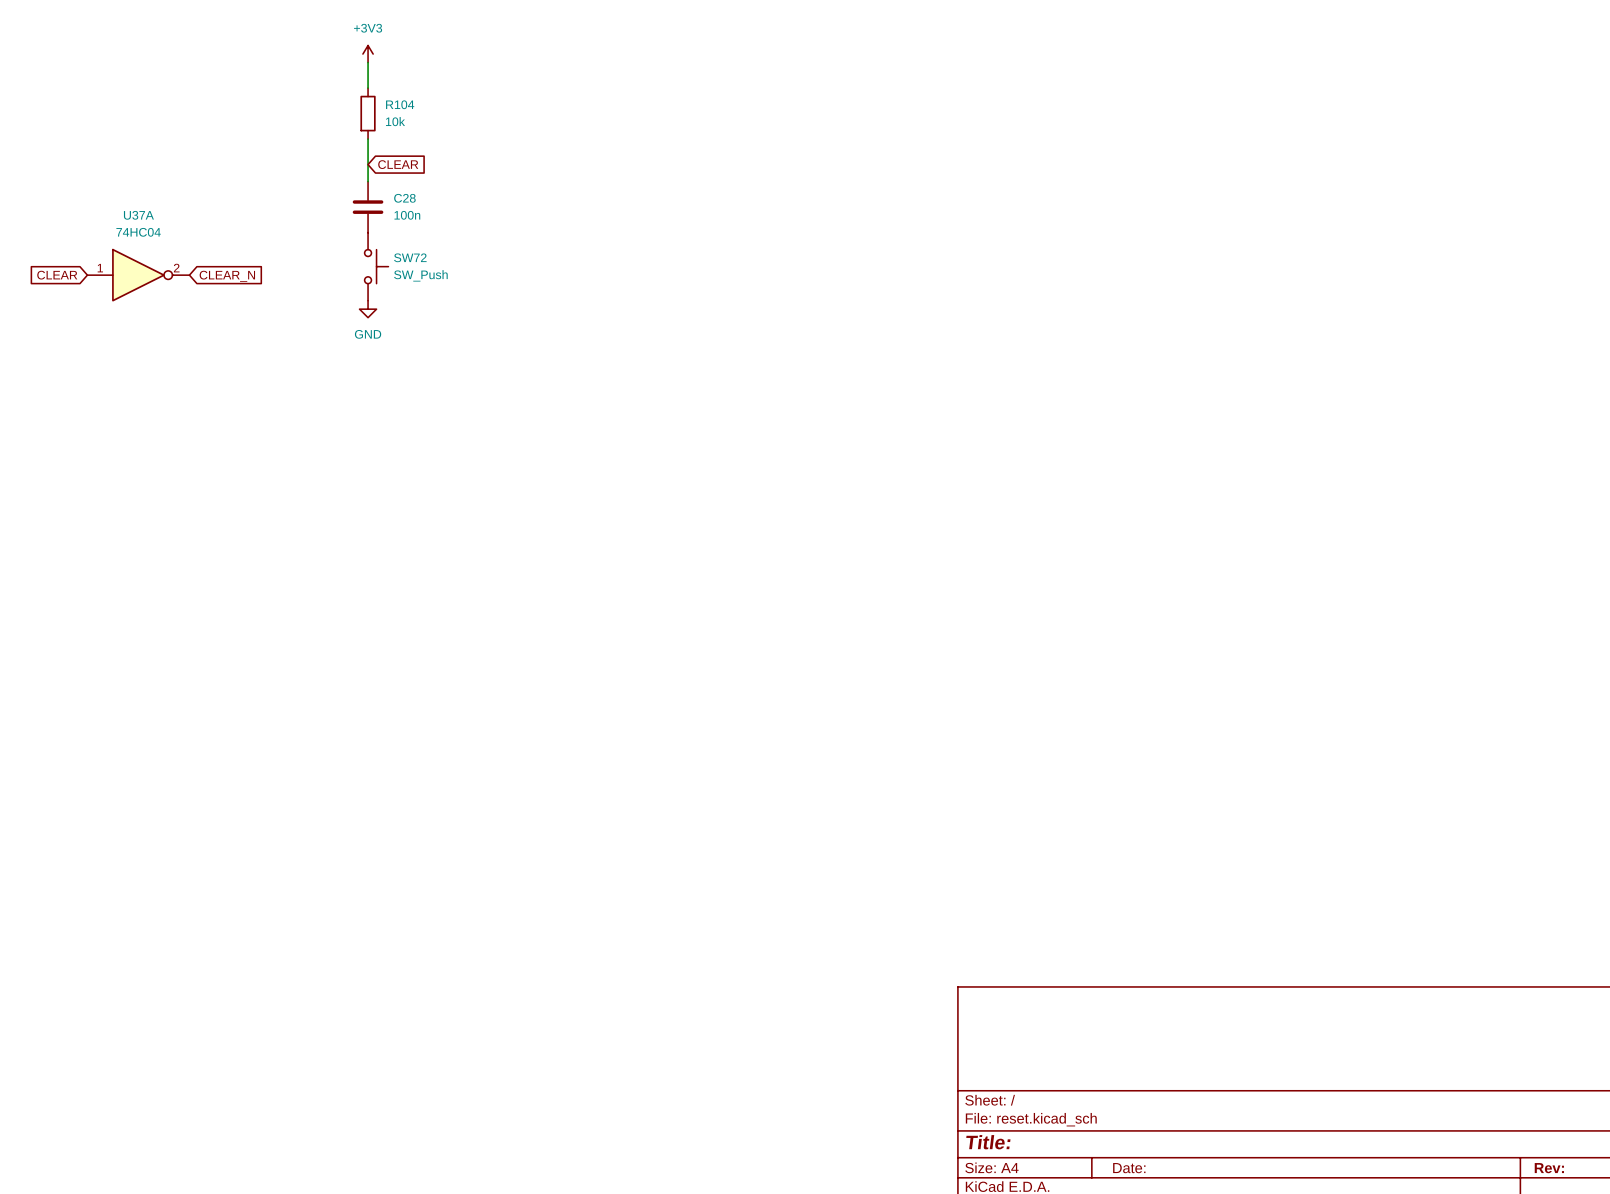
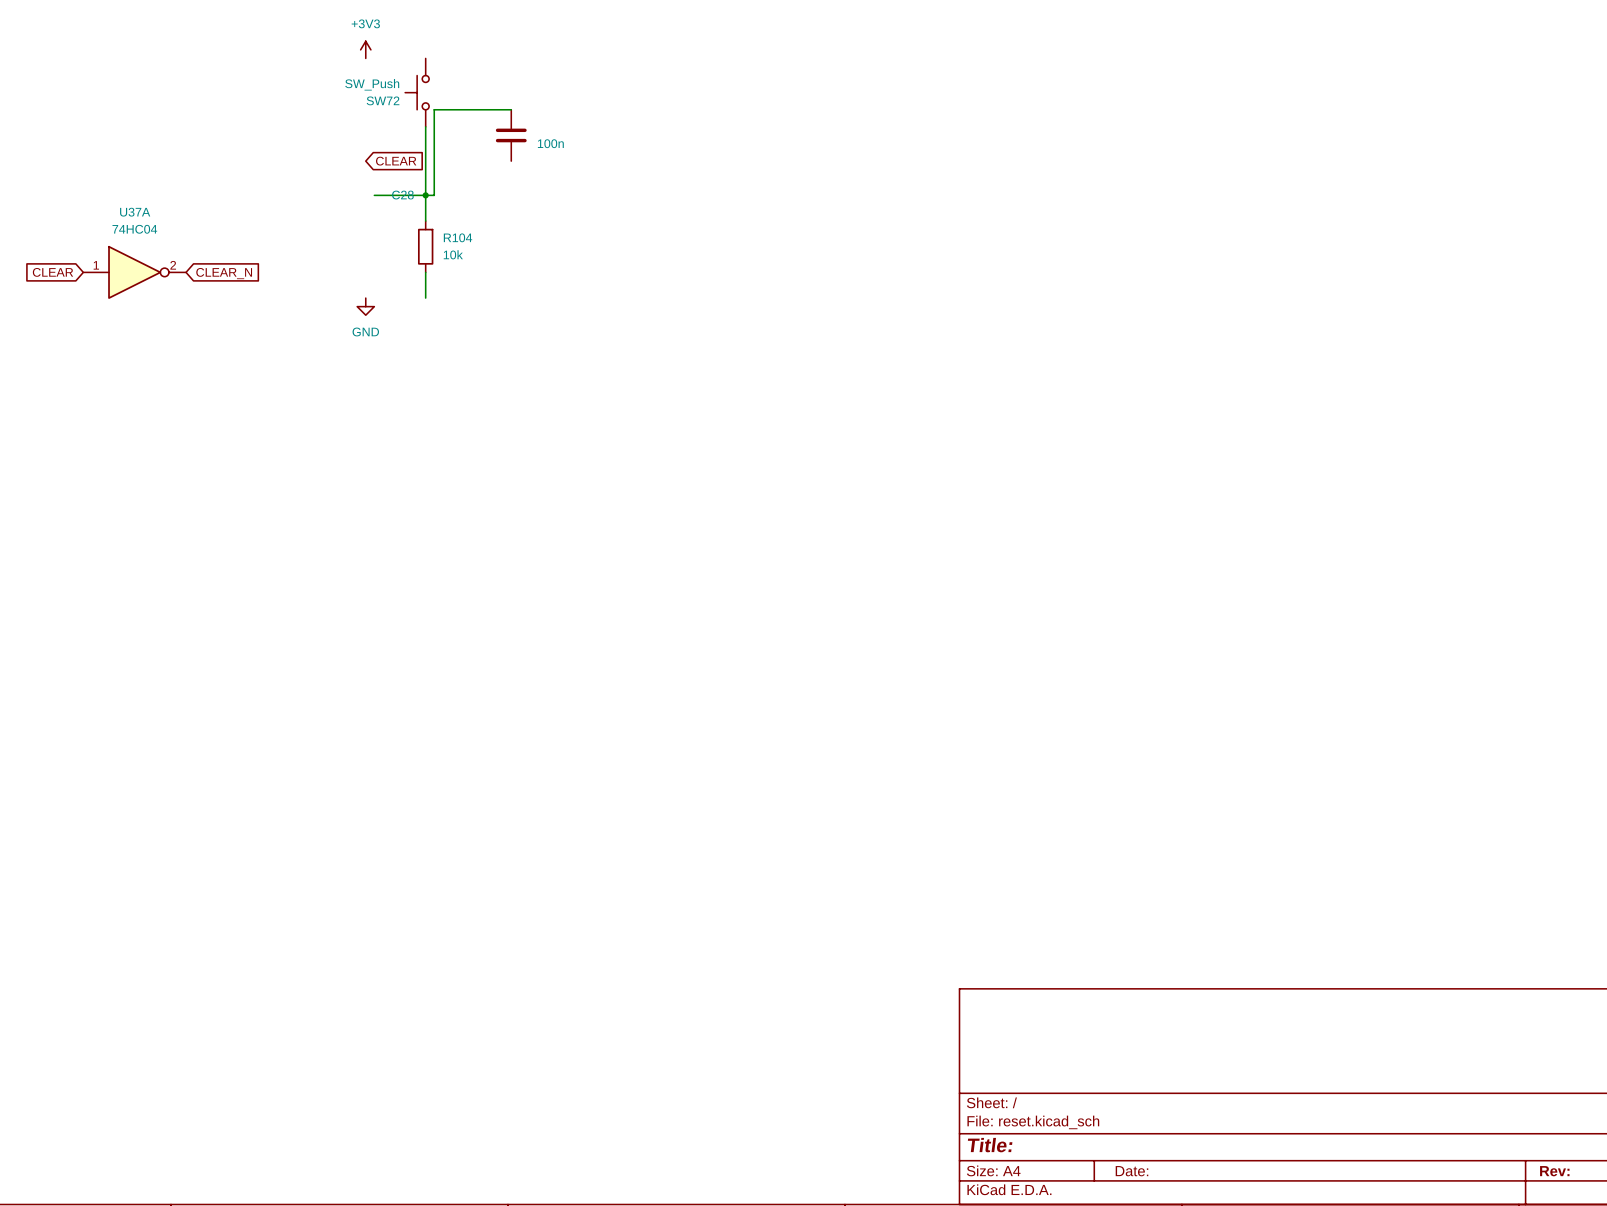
wire: (368, 62) (368, 88) -> none
R104 position: (368, 113) -> (425, 246)
wire: none -> (511, 109) (434, 109) (434, 195) (374, 195)
wire: none -> (425, 126) (425, 221)
wire: (368, 139) (368, 181) -> none
junction: none -> (425, 195)
C28 position: (368, 207) -> (511, 135)
SW72 rotation: 0° (376, 266) -> 180° (417, 92)
SW72 position: (376, 266) -> (417, 92)
wire: none -> (425, 272) (425, 298)

